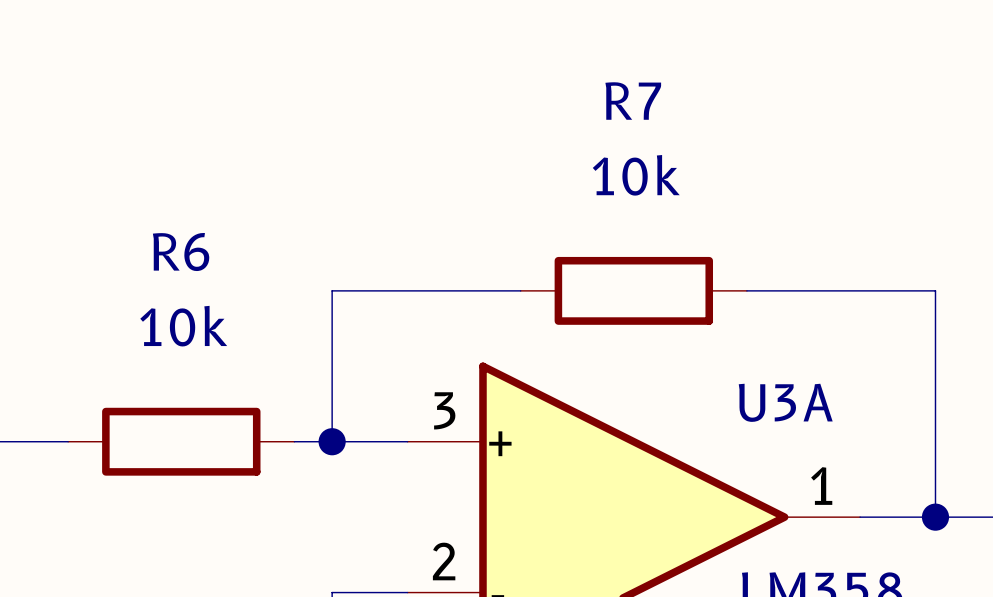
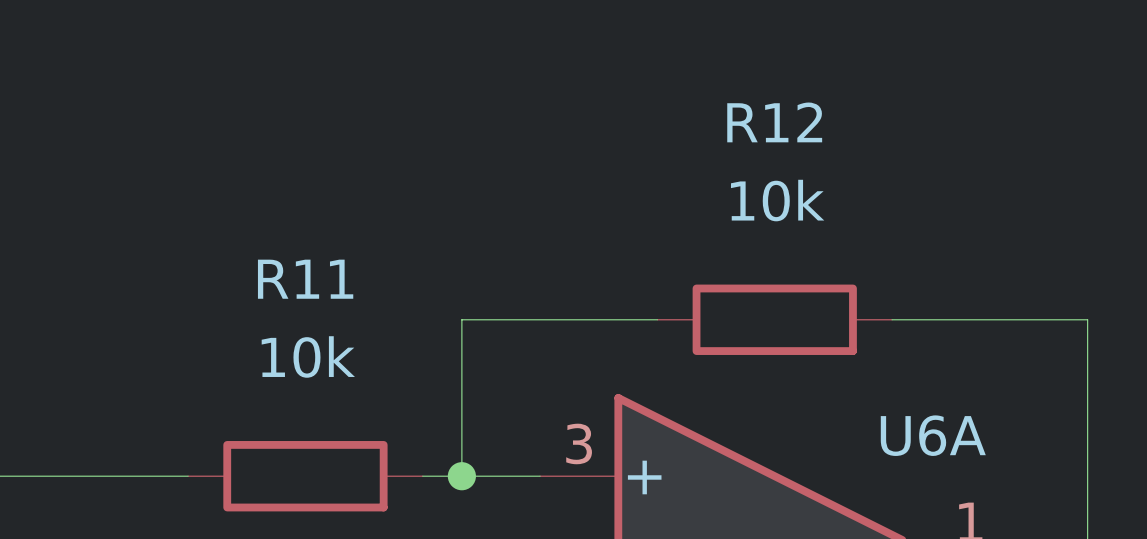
R7 name: R7 (633, 101) -> R12 (774, 122)
R6 name: R6 (181, 252) -> R11 (305, 279)
U3A name: U3A (785, 402) -> U6A (933, 435)

